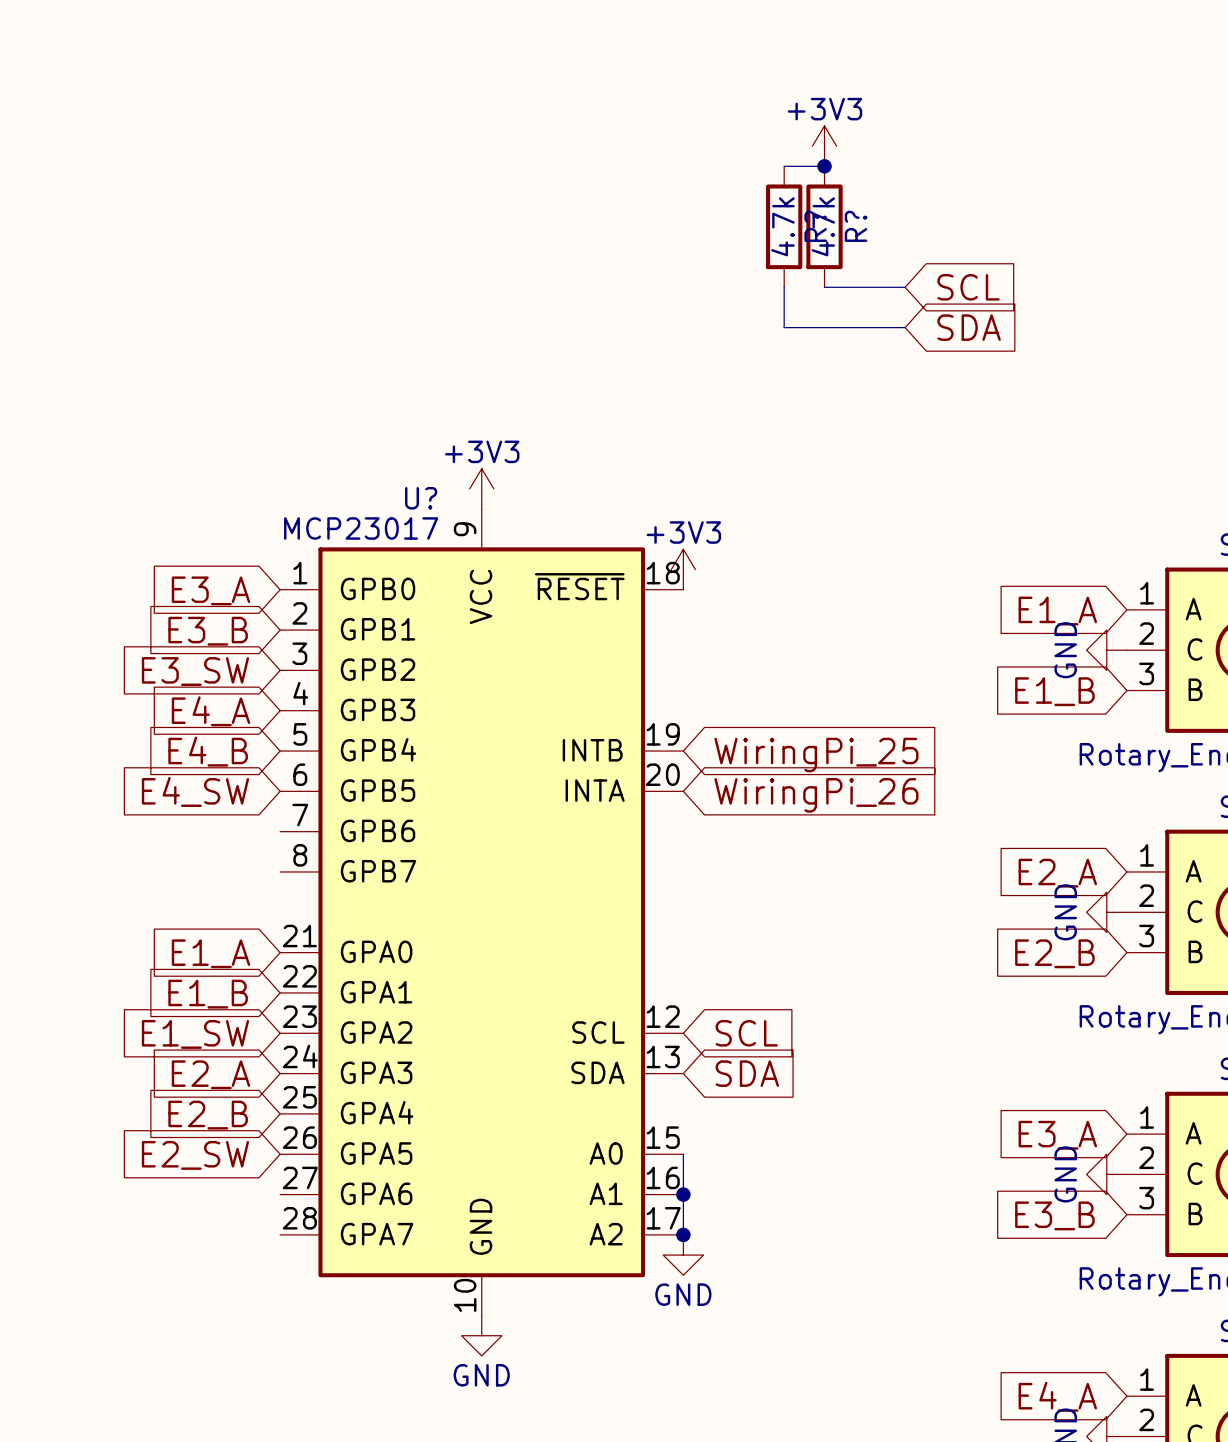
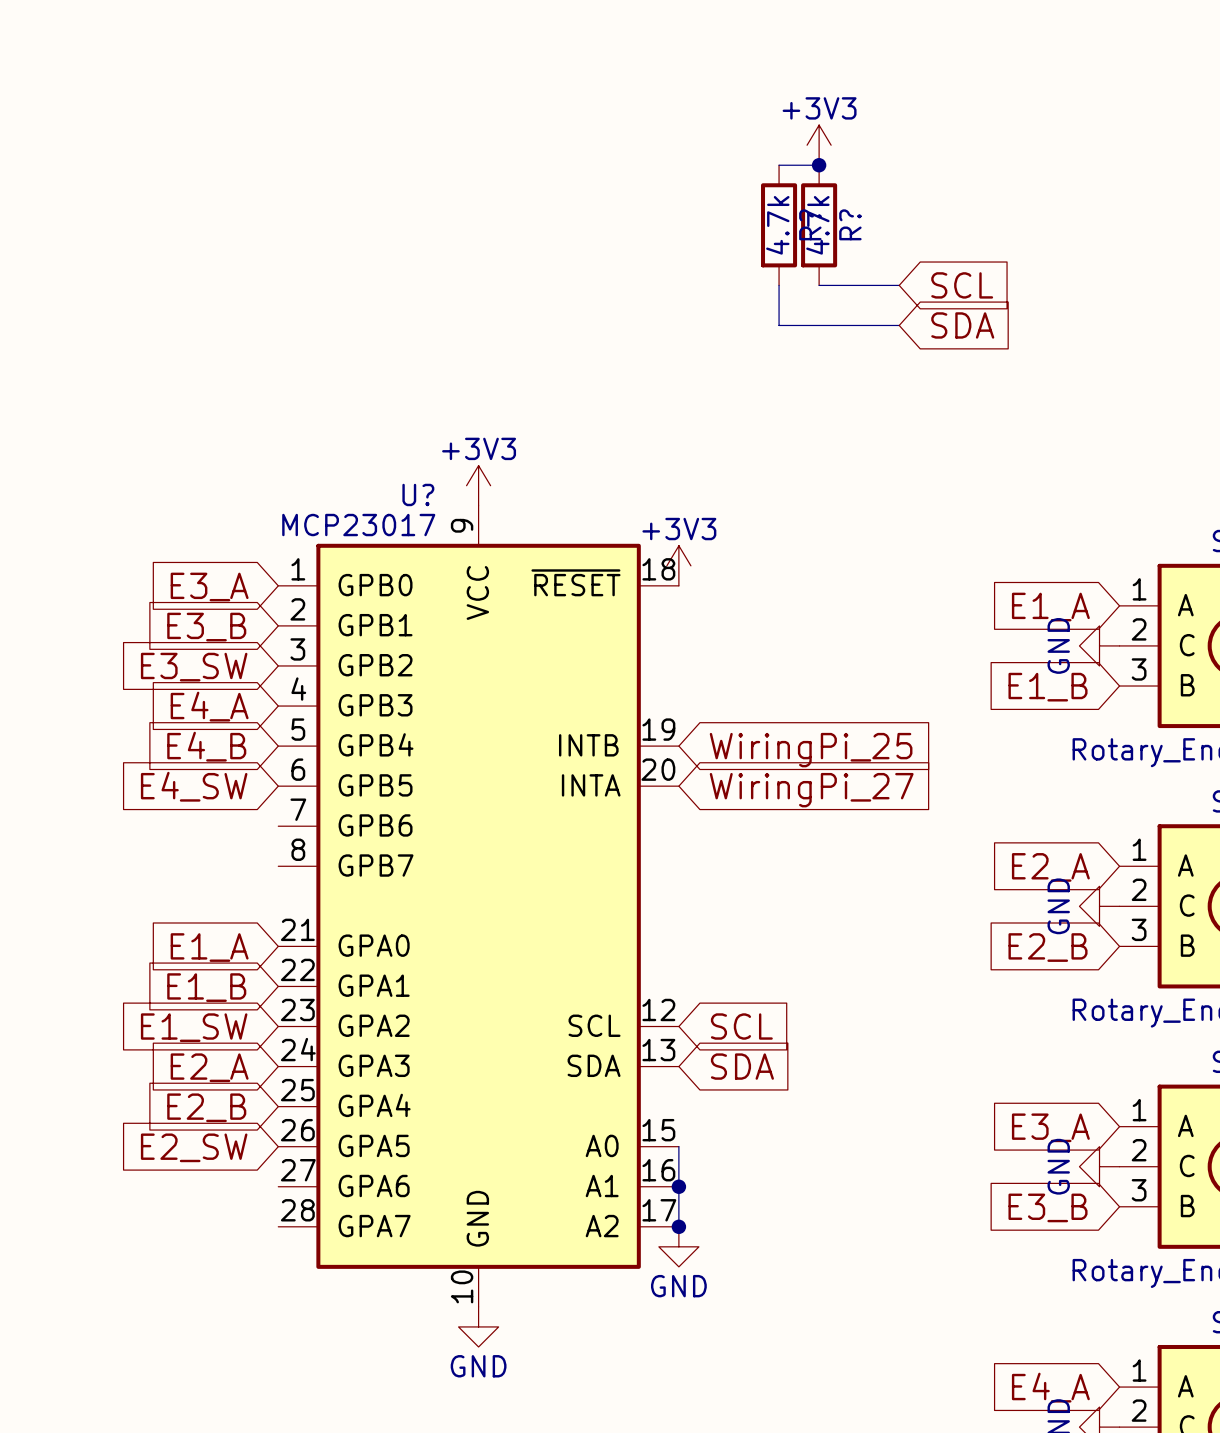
global label: WiringPi_26 (816, 795) -> WiringPi_27 (811, 790)

